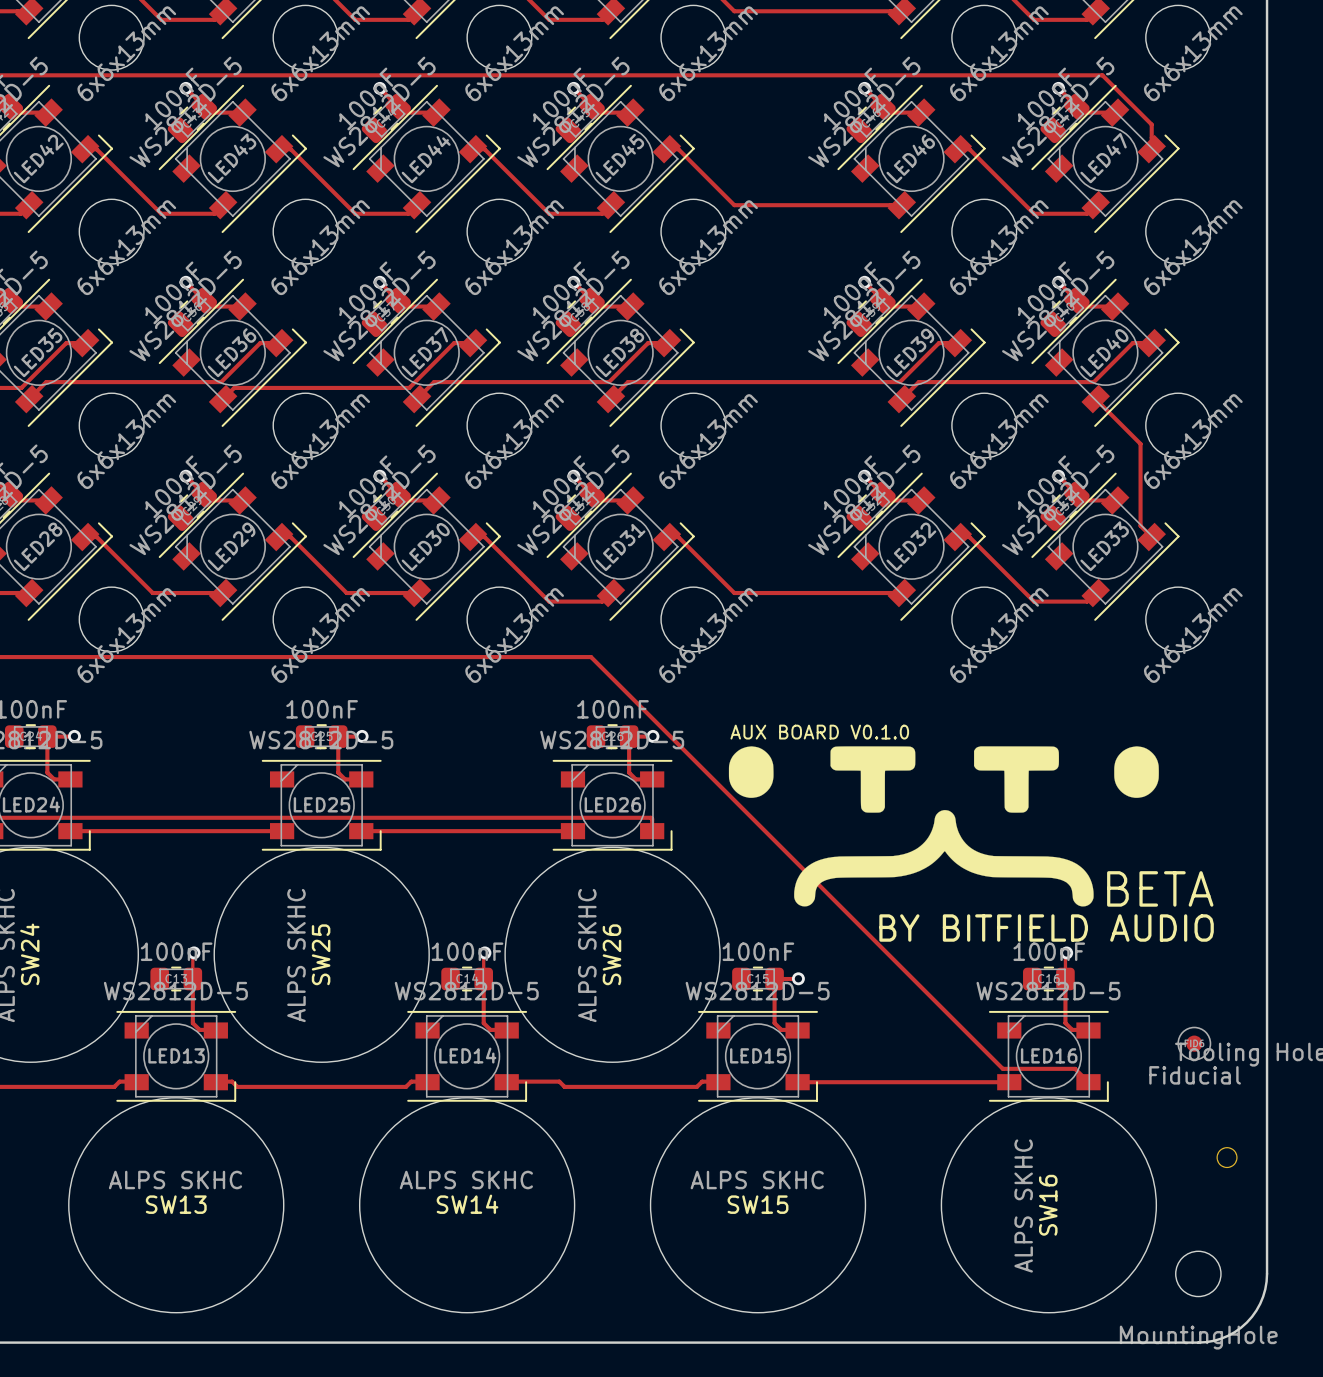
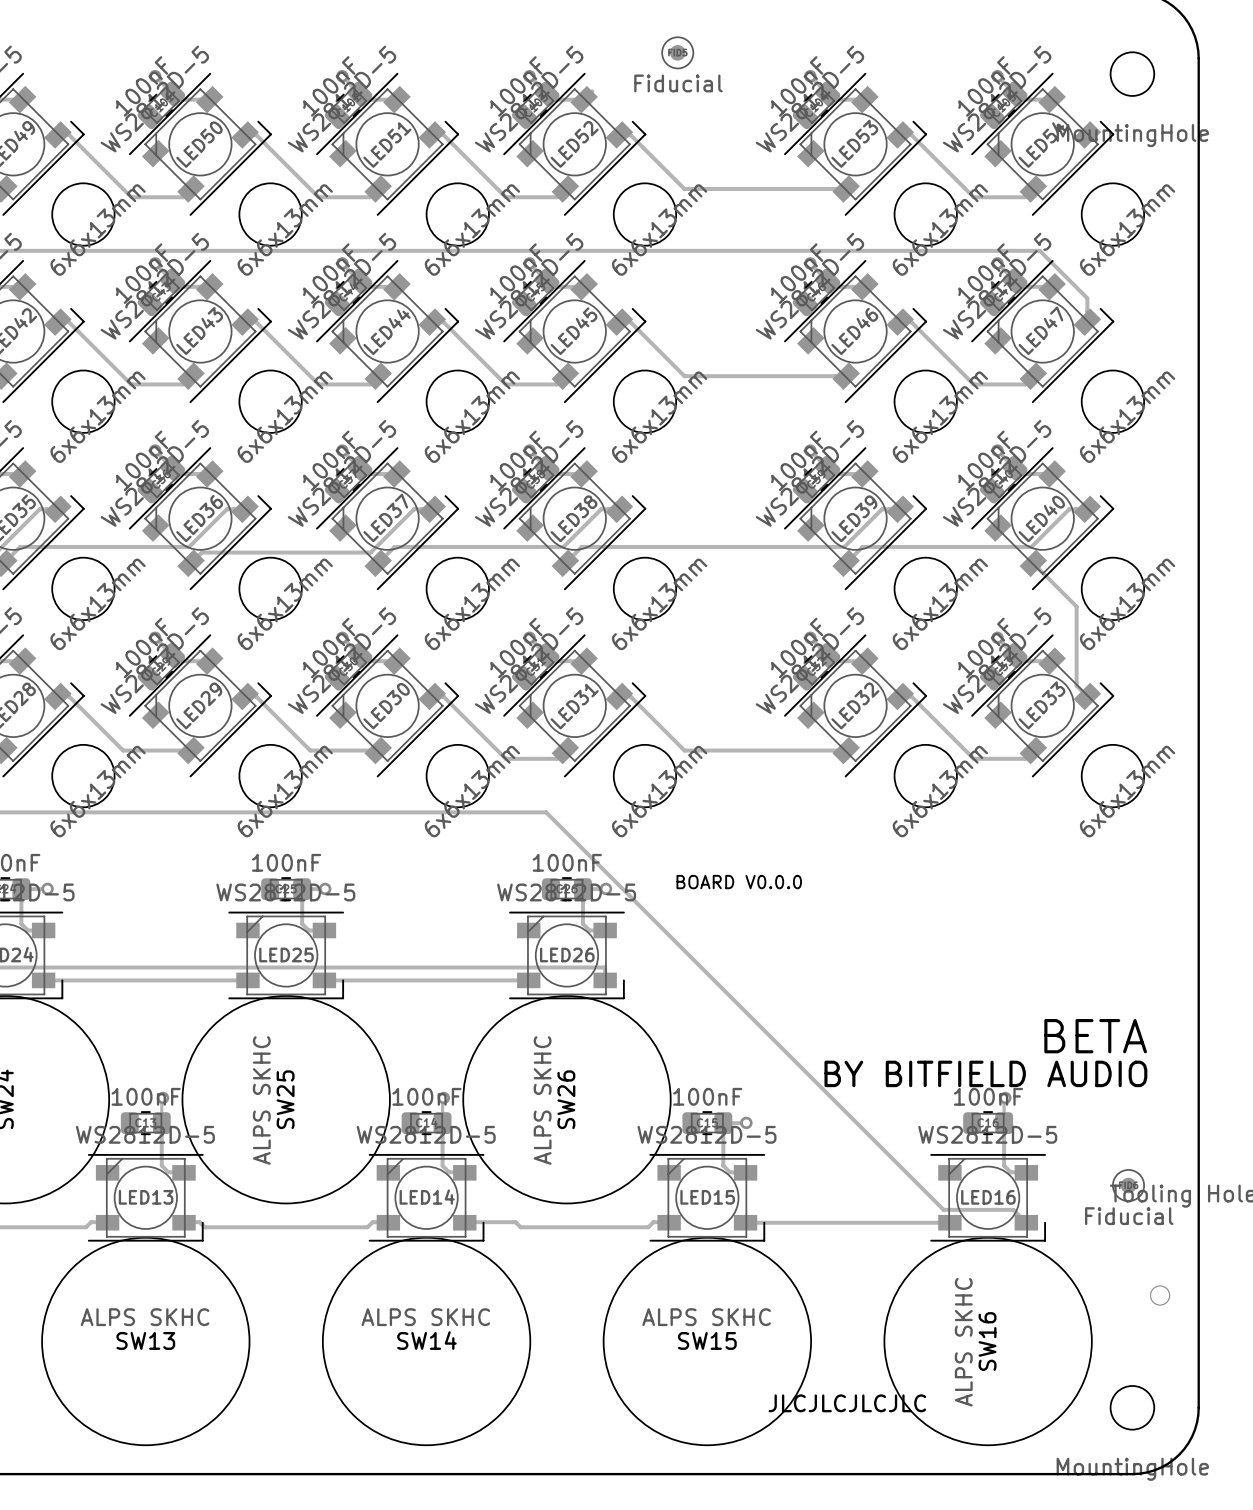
text: AUX BOARD V0.1.0 (819, 732) -> BOARD V0.0.0 (739, 882)
drawing: [728, 746, 1159, 907] -> none
text: none -> JLCJLCJLCJLC (847, 1403)

